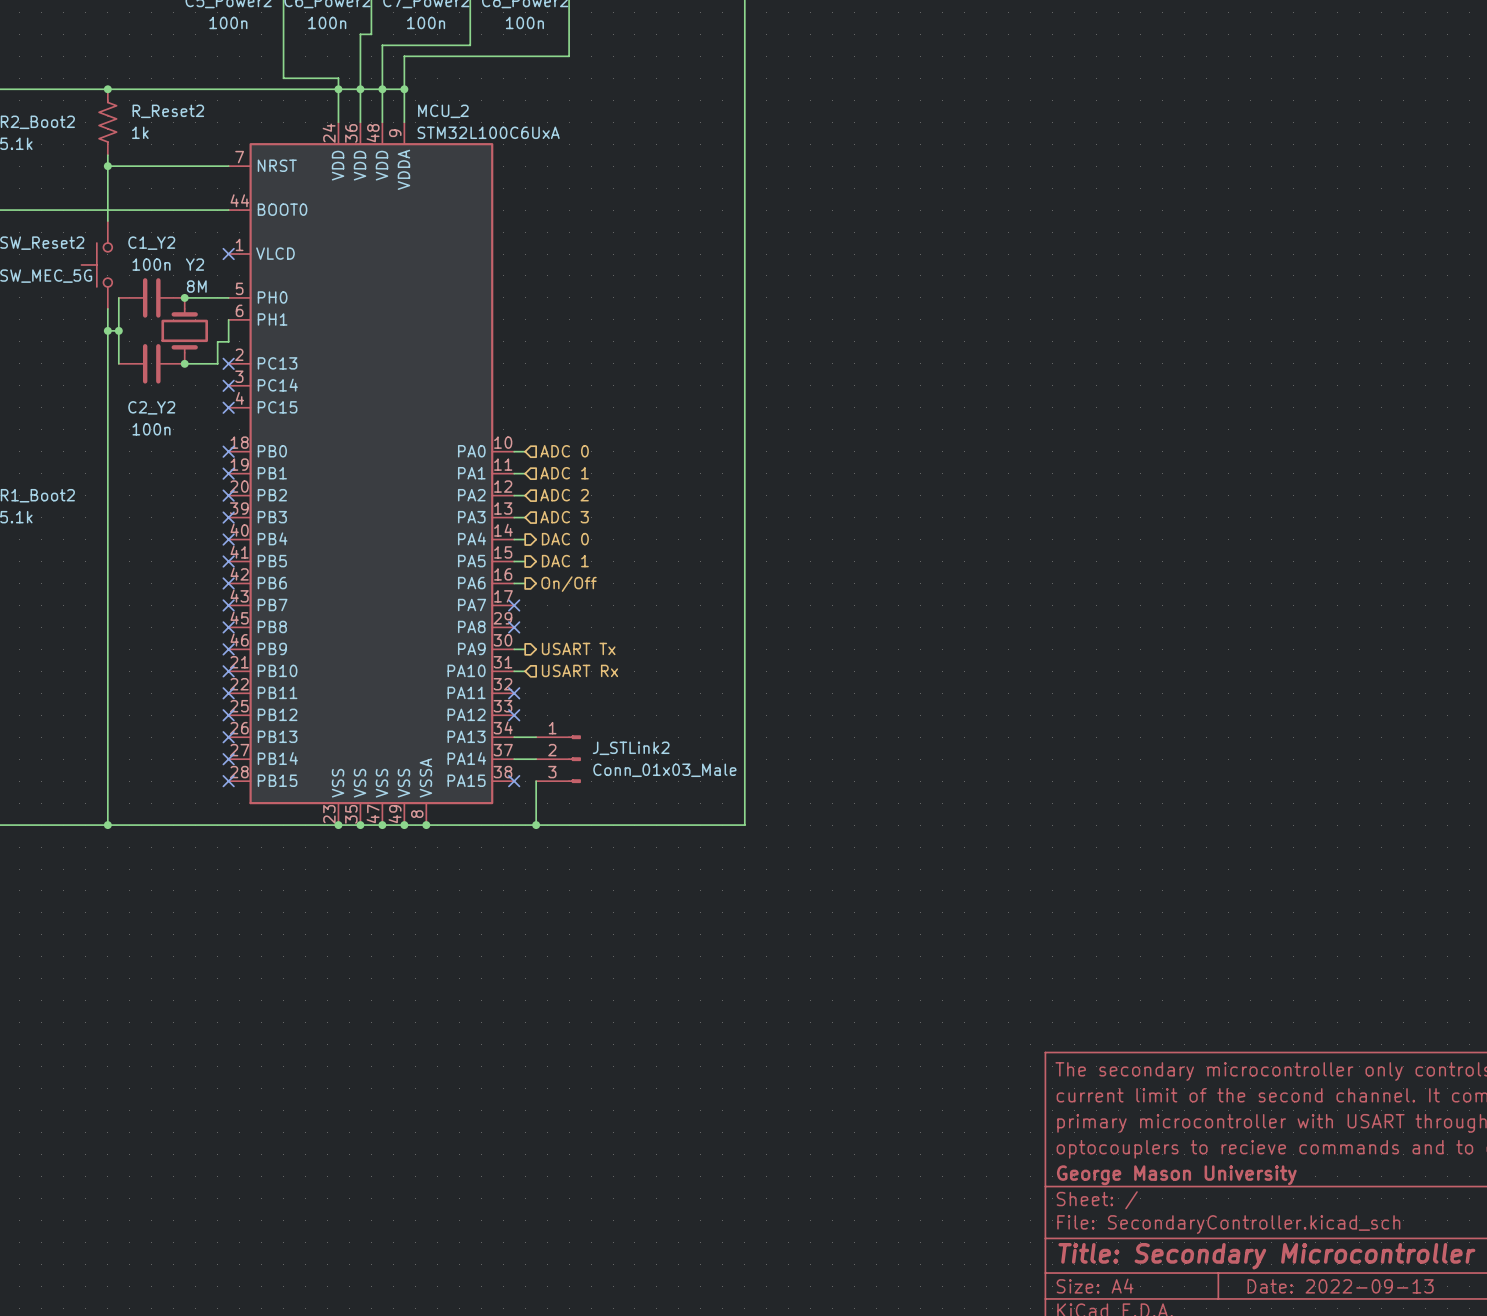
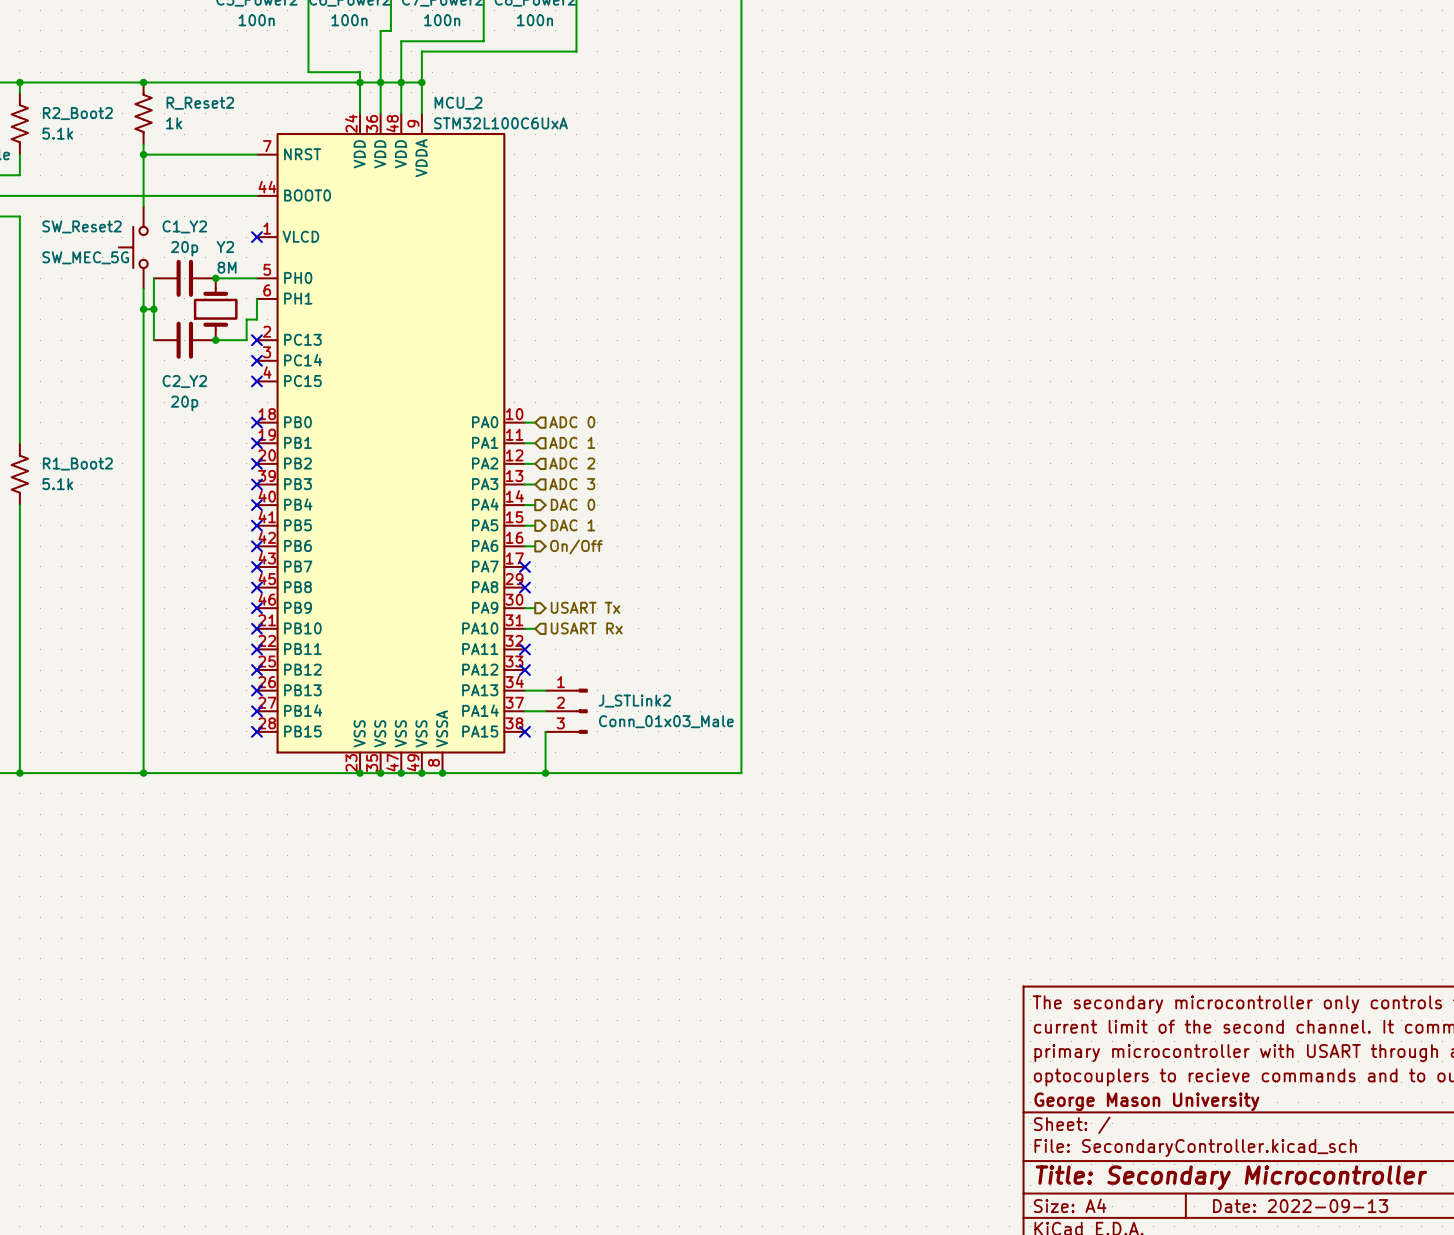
C1_Y2 value: 100n (151, 264) -> 20p (184, 248)
C2_Y2 value: 100n (151, 429) -> 20p (184, 403)

